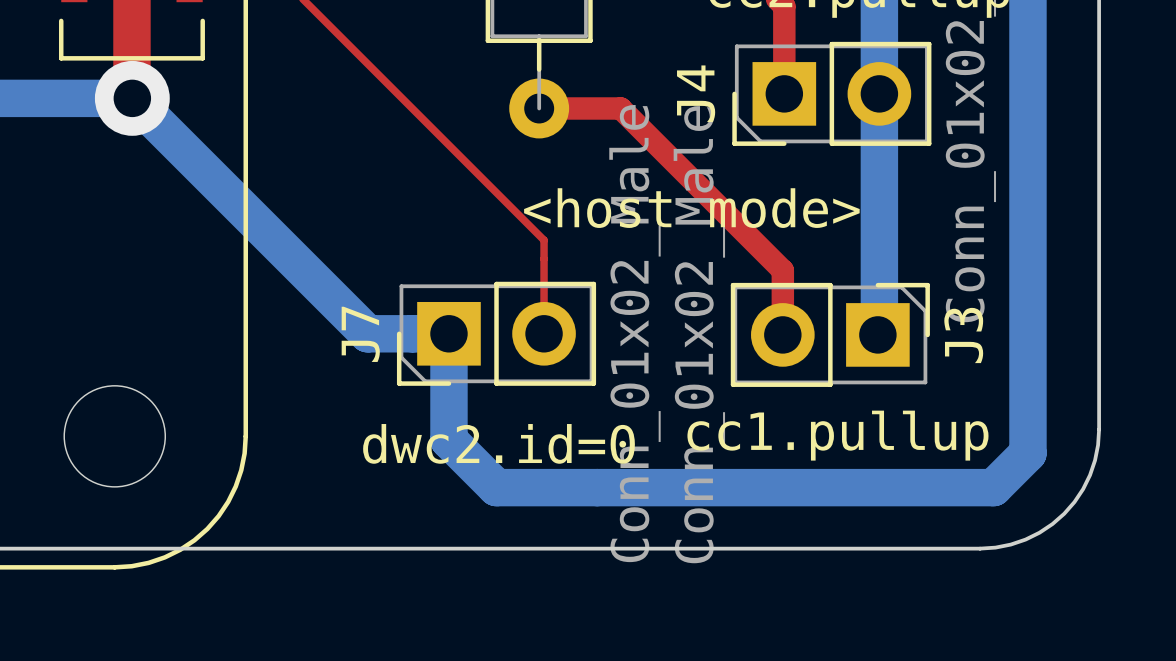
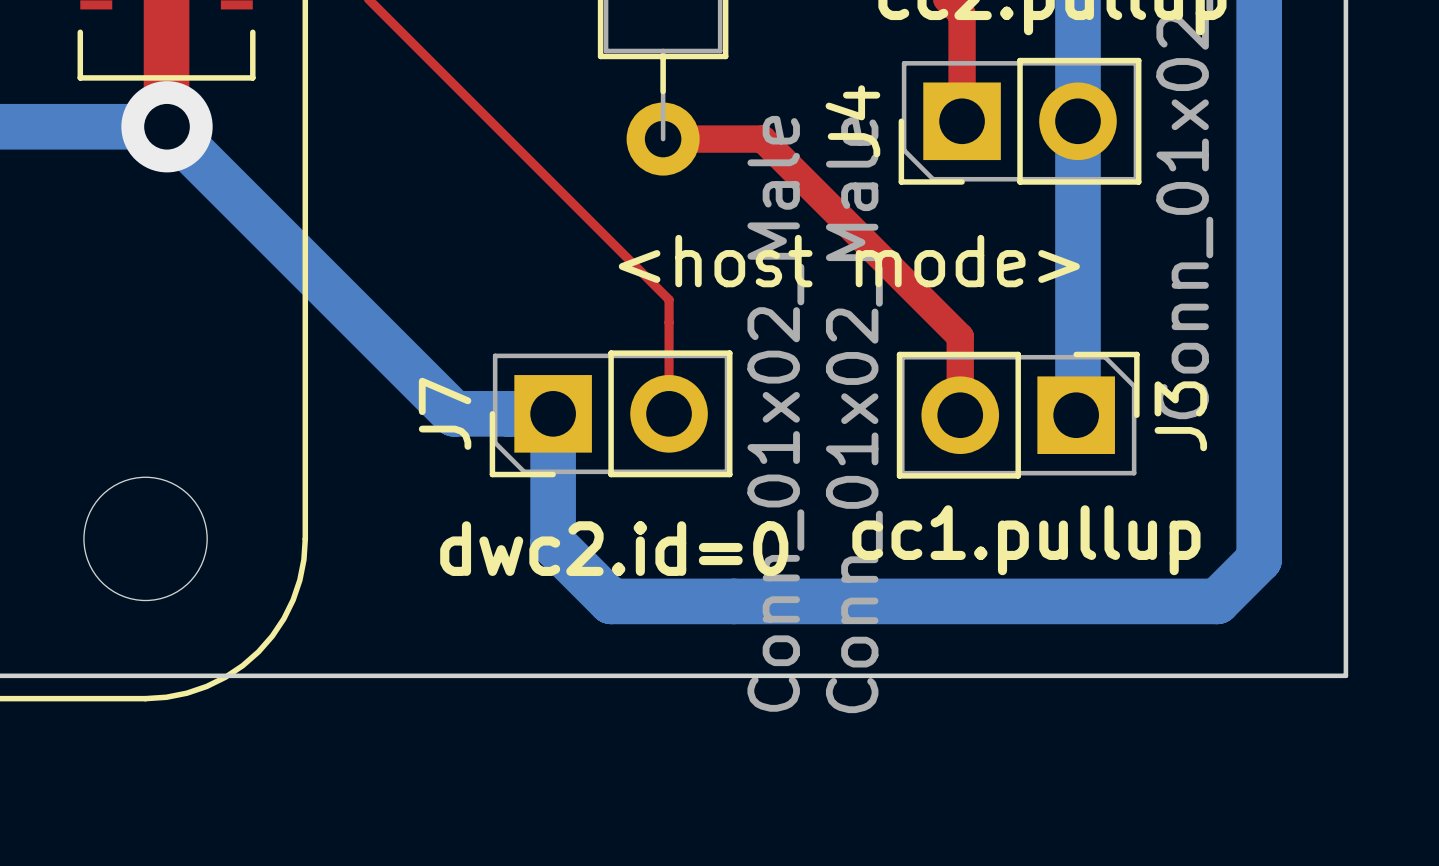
board edge: (1099, 429) (1098, 445) (1090, 475) (1074, 502) (1064, 513) (1052, 524) (1025, 539) (995, 547) (980, 548) -> (1345, 530) (1345, 675) (1200, 675)

